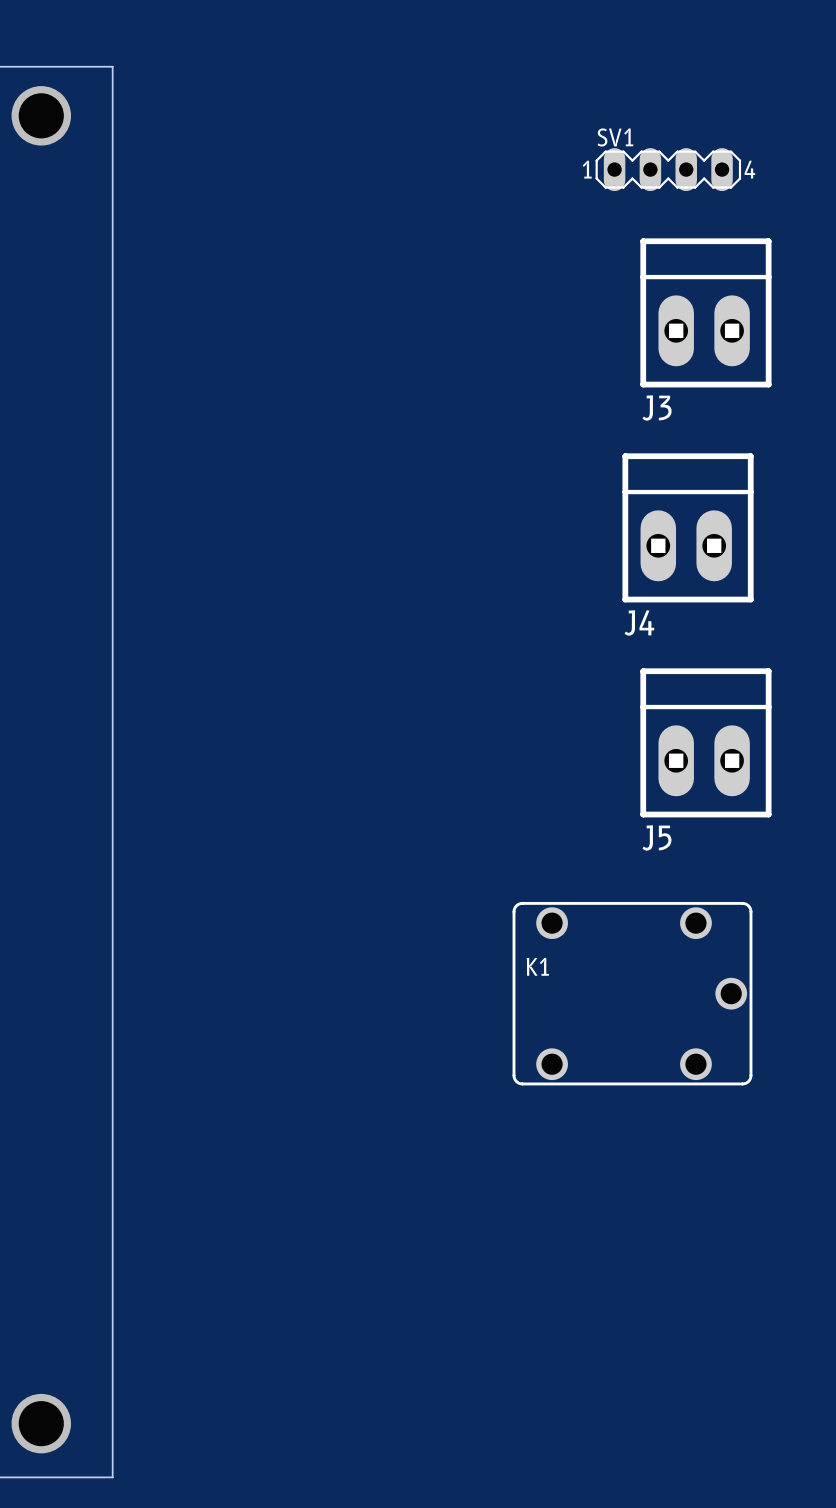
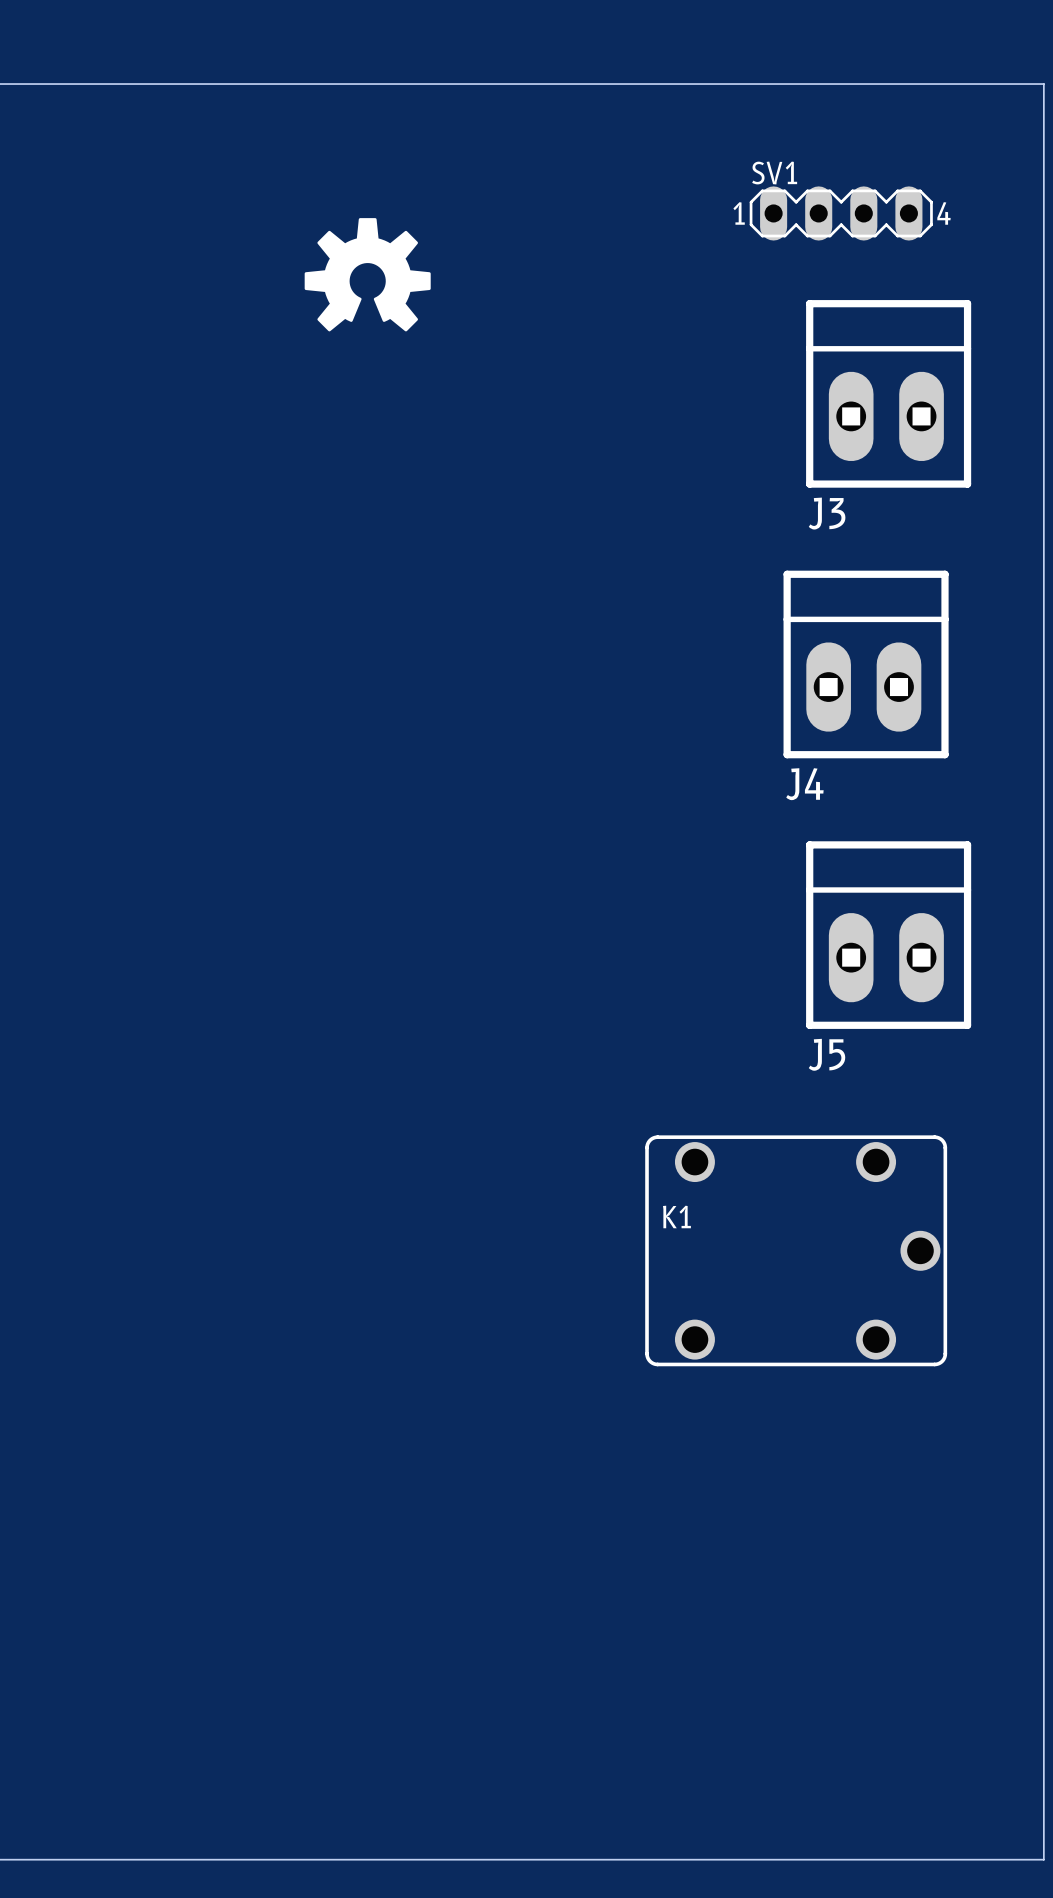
board edge: (112, 66) (112, 1477) -> (141, 84) (1043, 84) (1043, 1859) (141, 1859)
via: (41, 115) -> none
drawing: none -> [304, 218, 431, 332]
via: (41, 1423) -> none

